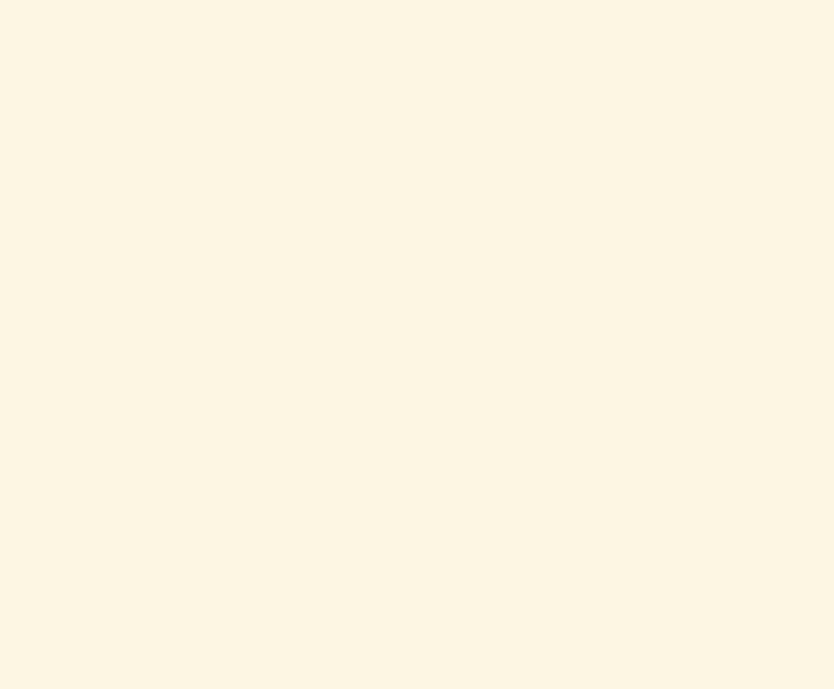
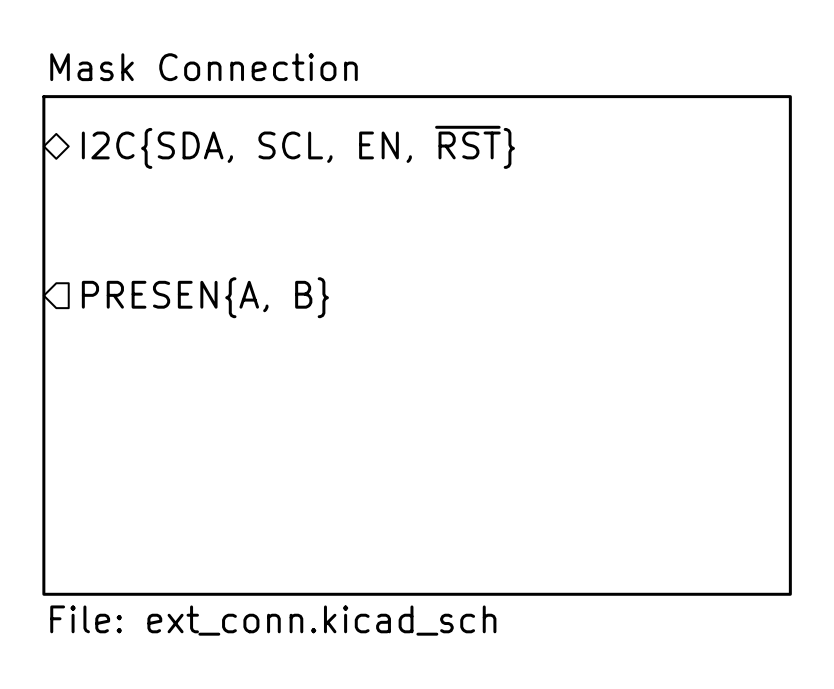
sheet pin: none -> I2C{SDA, SCL, EN, ~{RST}} (298, 147)
sheet pin: none -> PRESEN{A, B} (205, 297)
sheet Mask Connection: none -> File: ext_conn.kicad_sch (417, 345)

